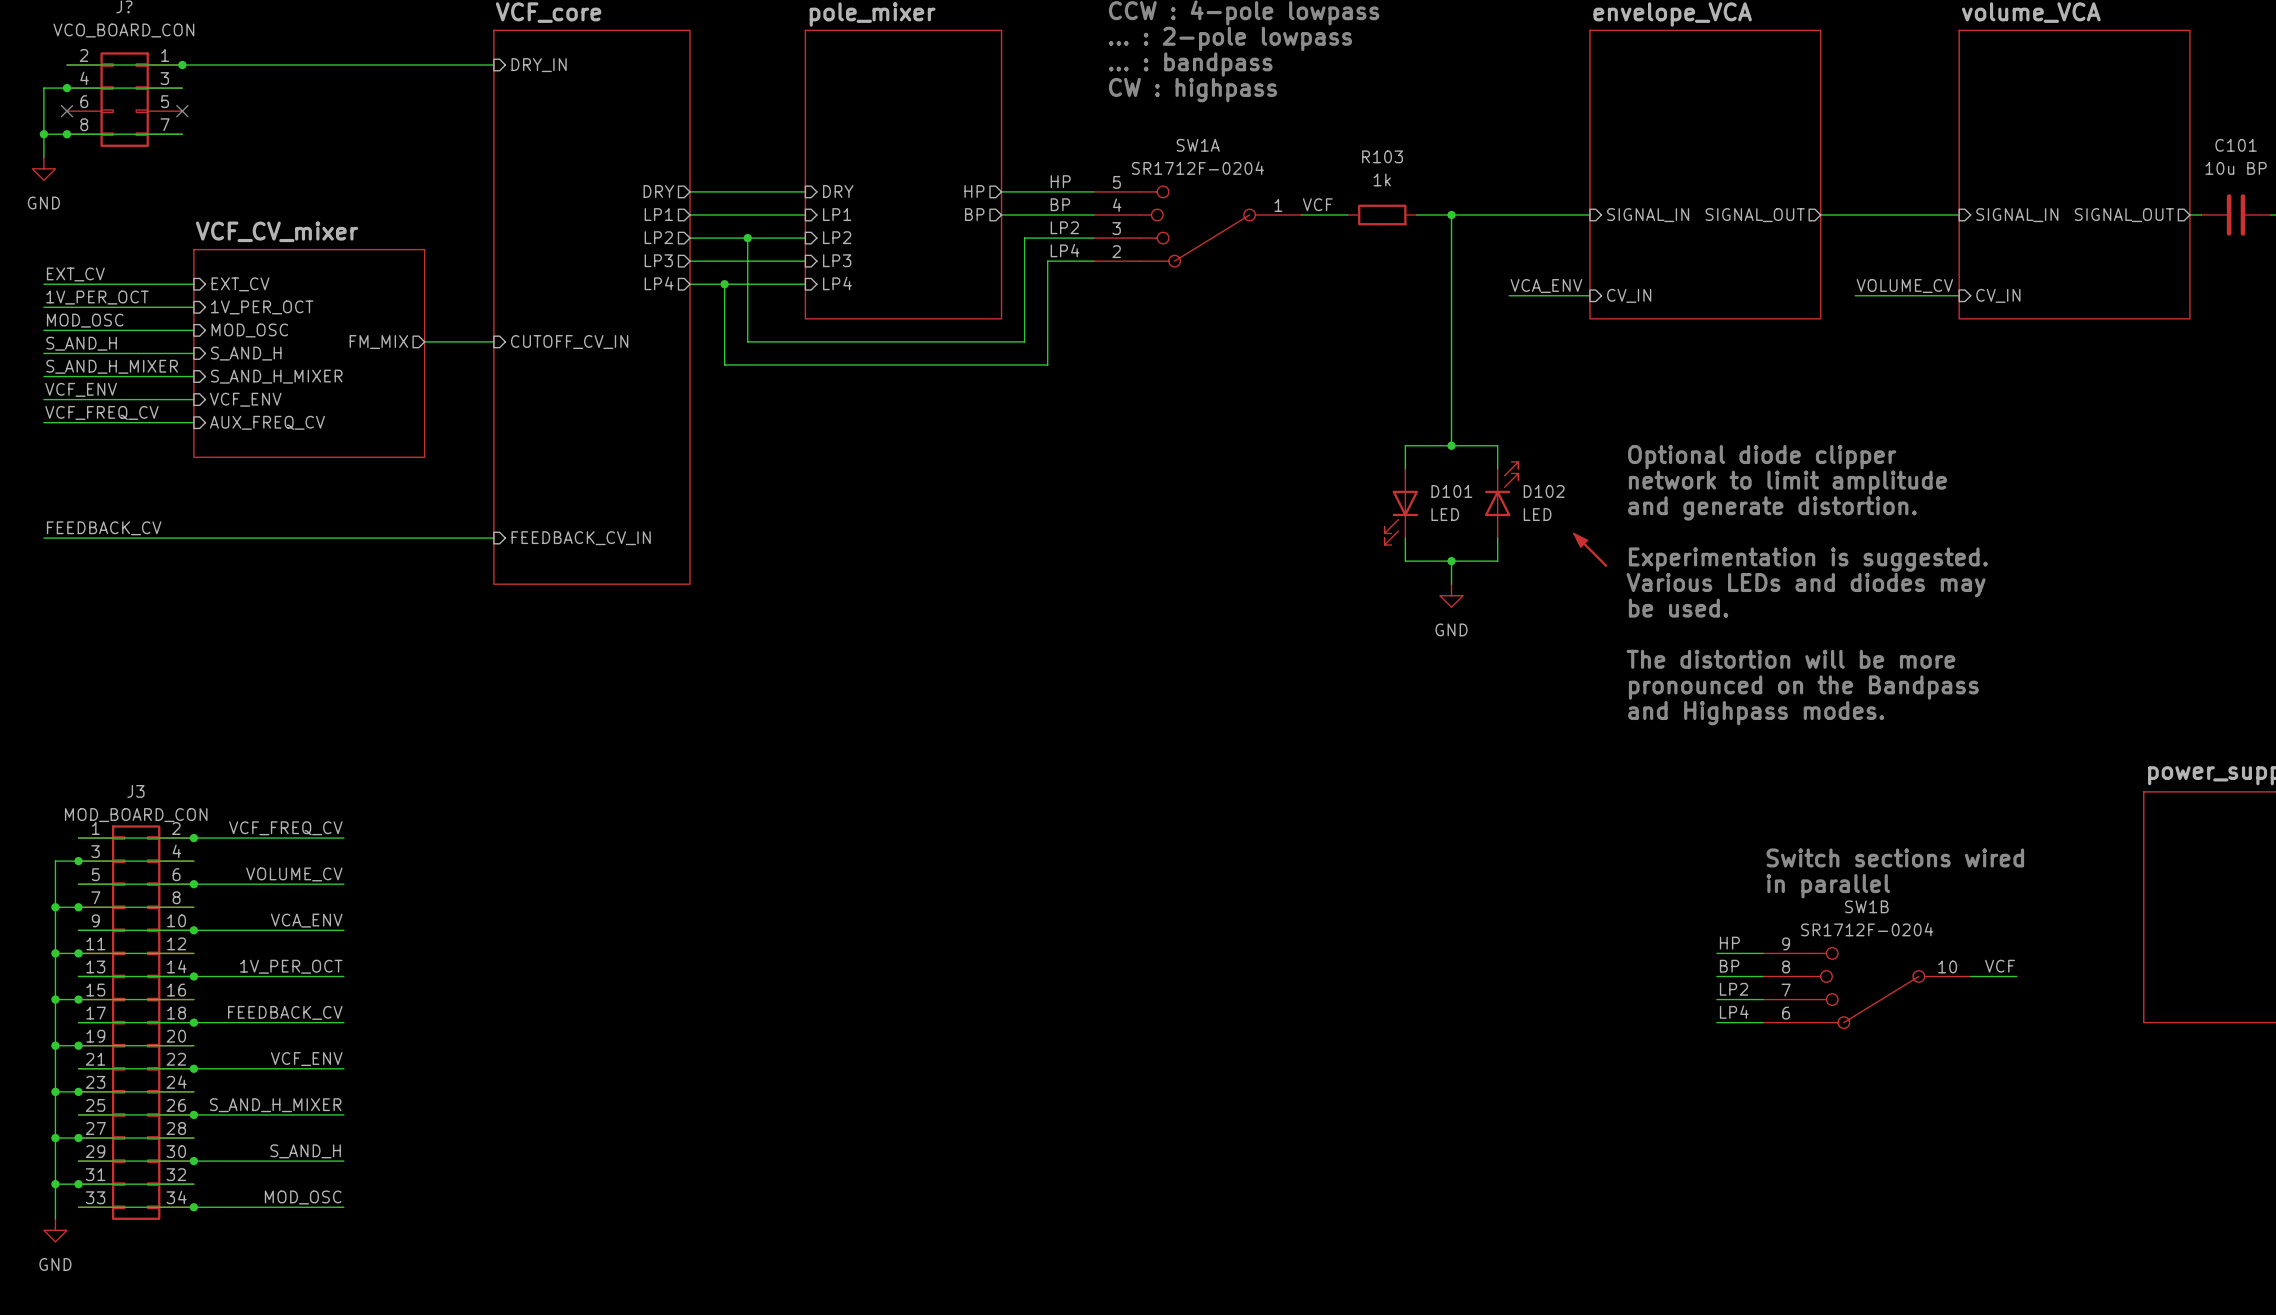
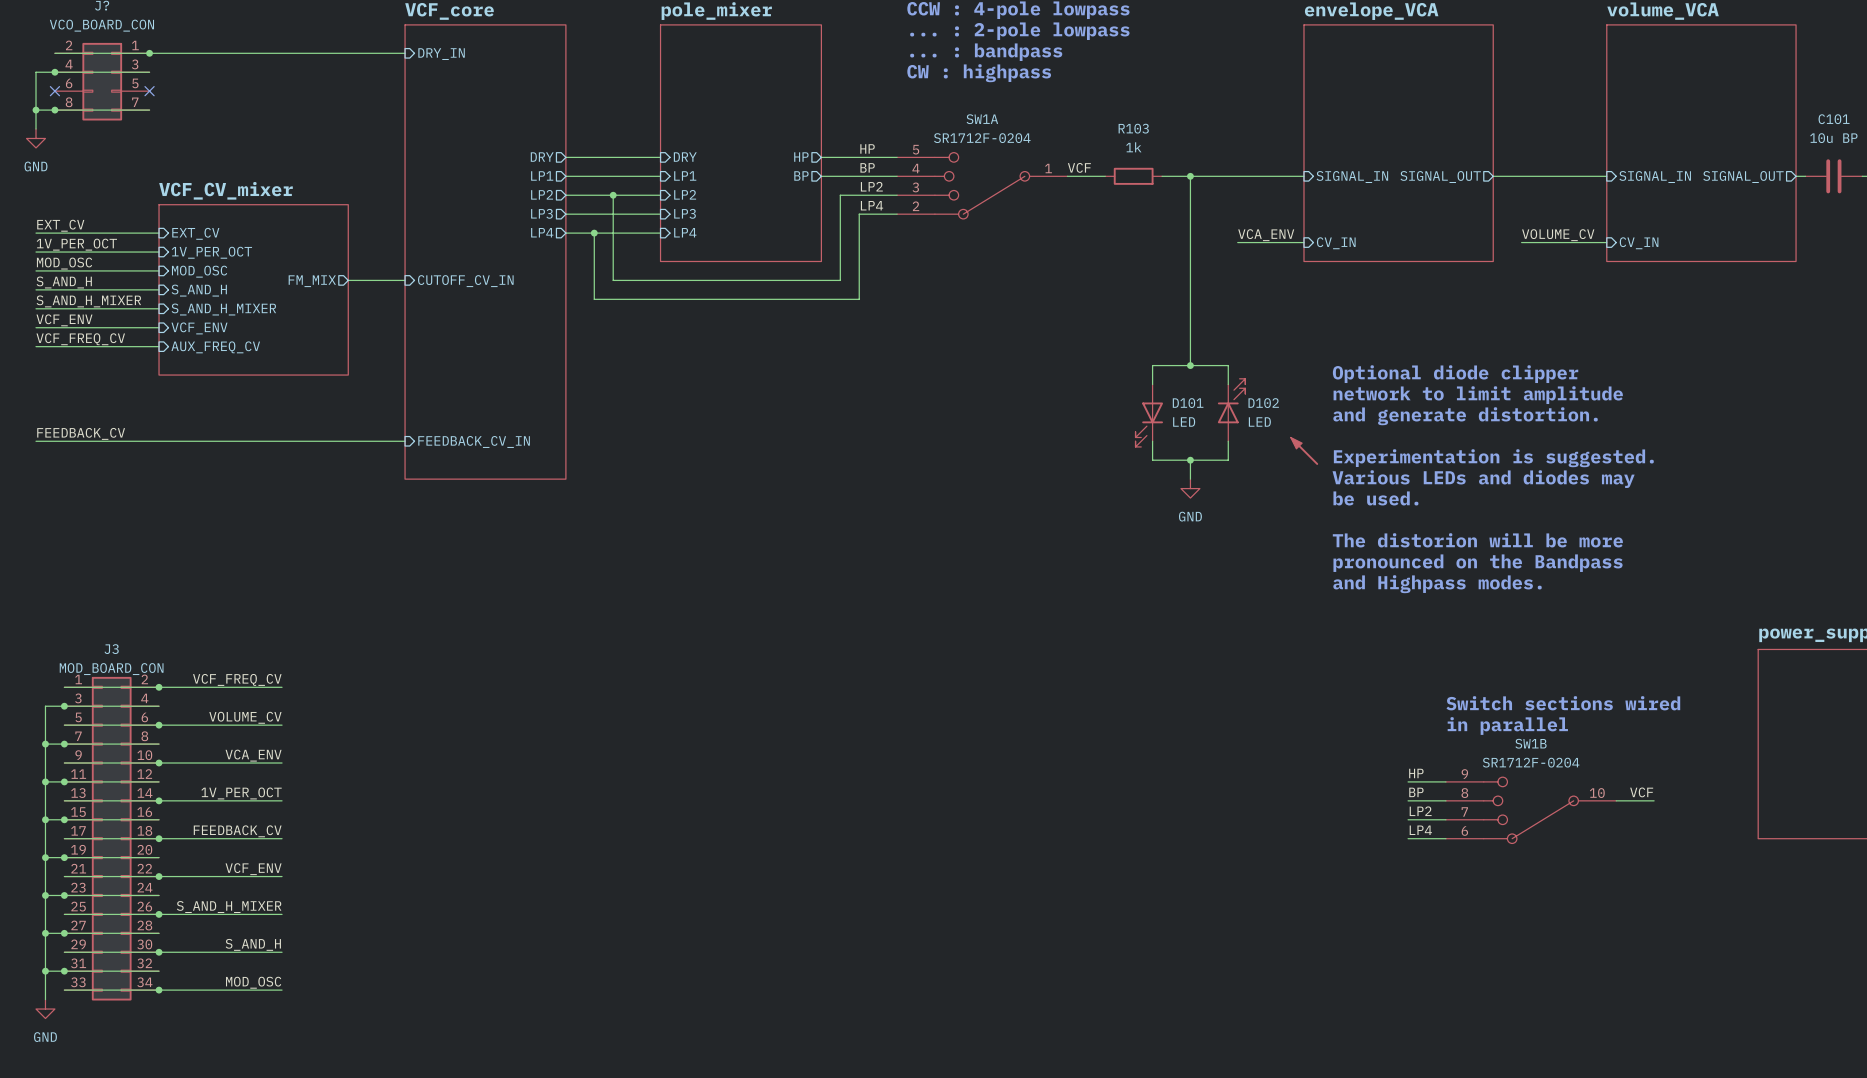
text: The distortion will be more (1790, 659) -> The distorion will be more (1477, 540)

